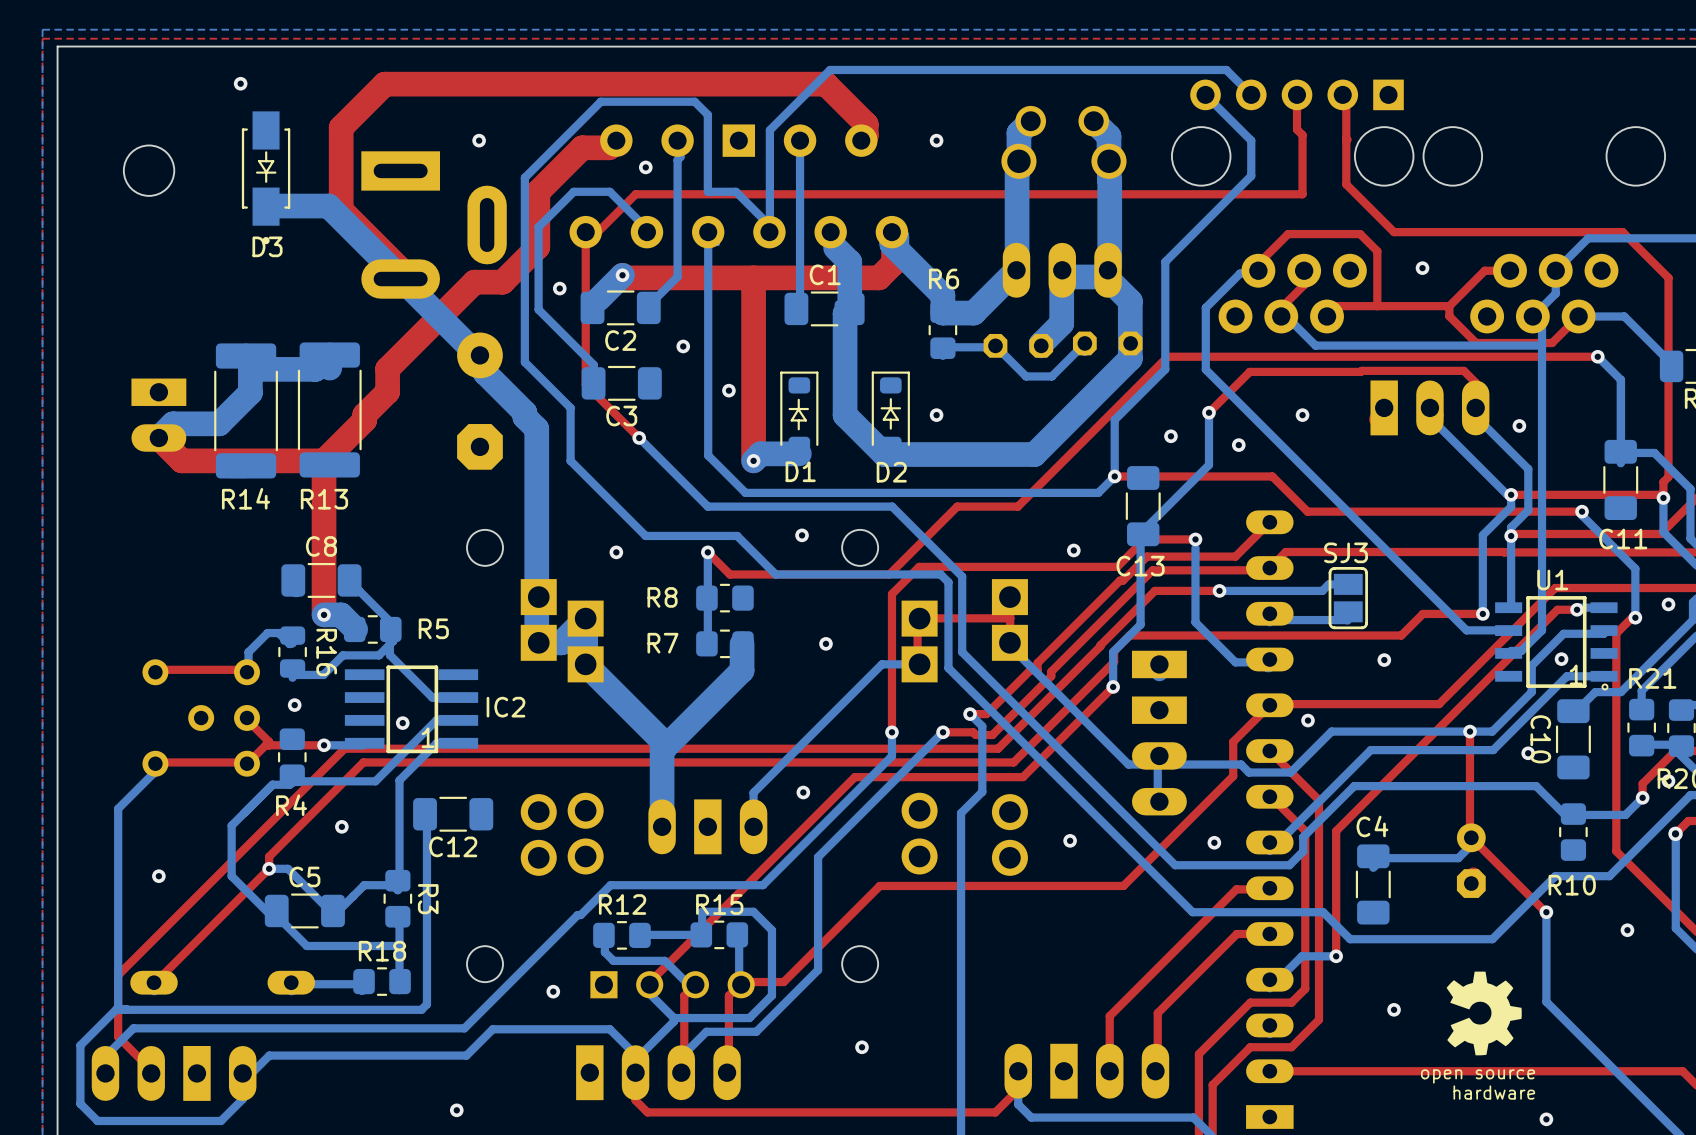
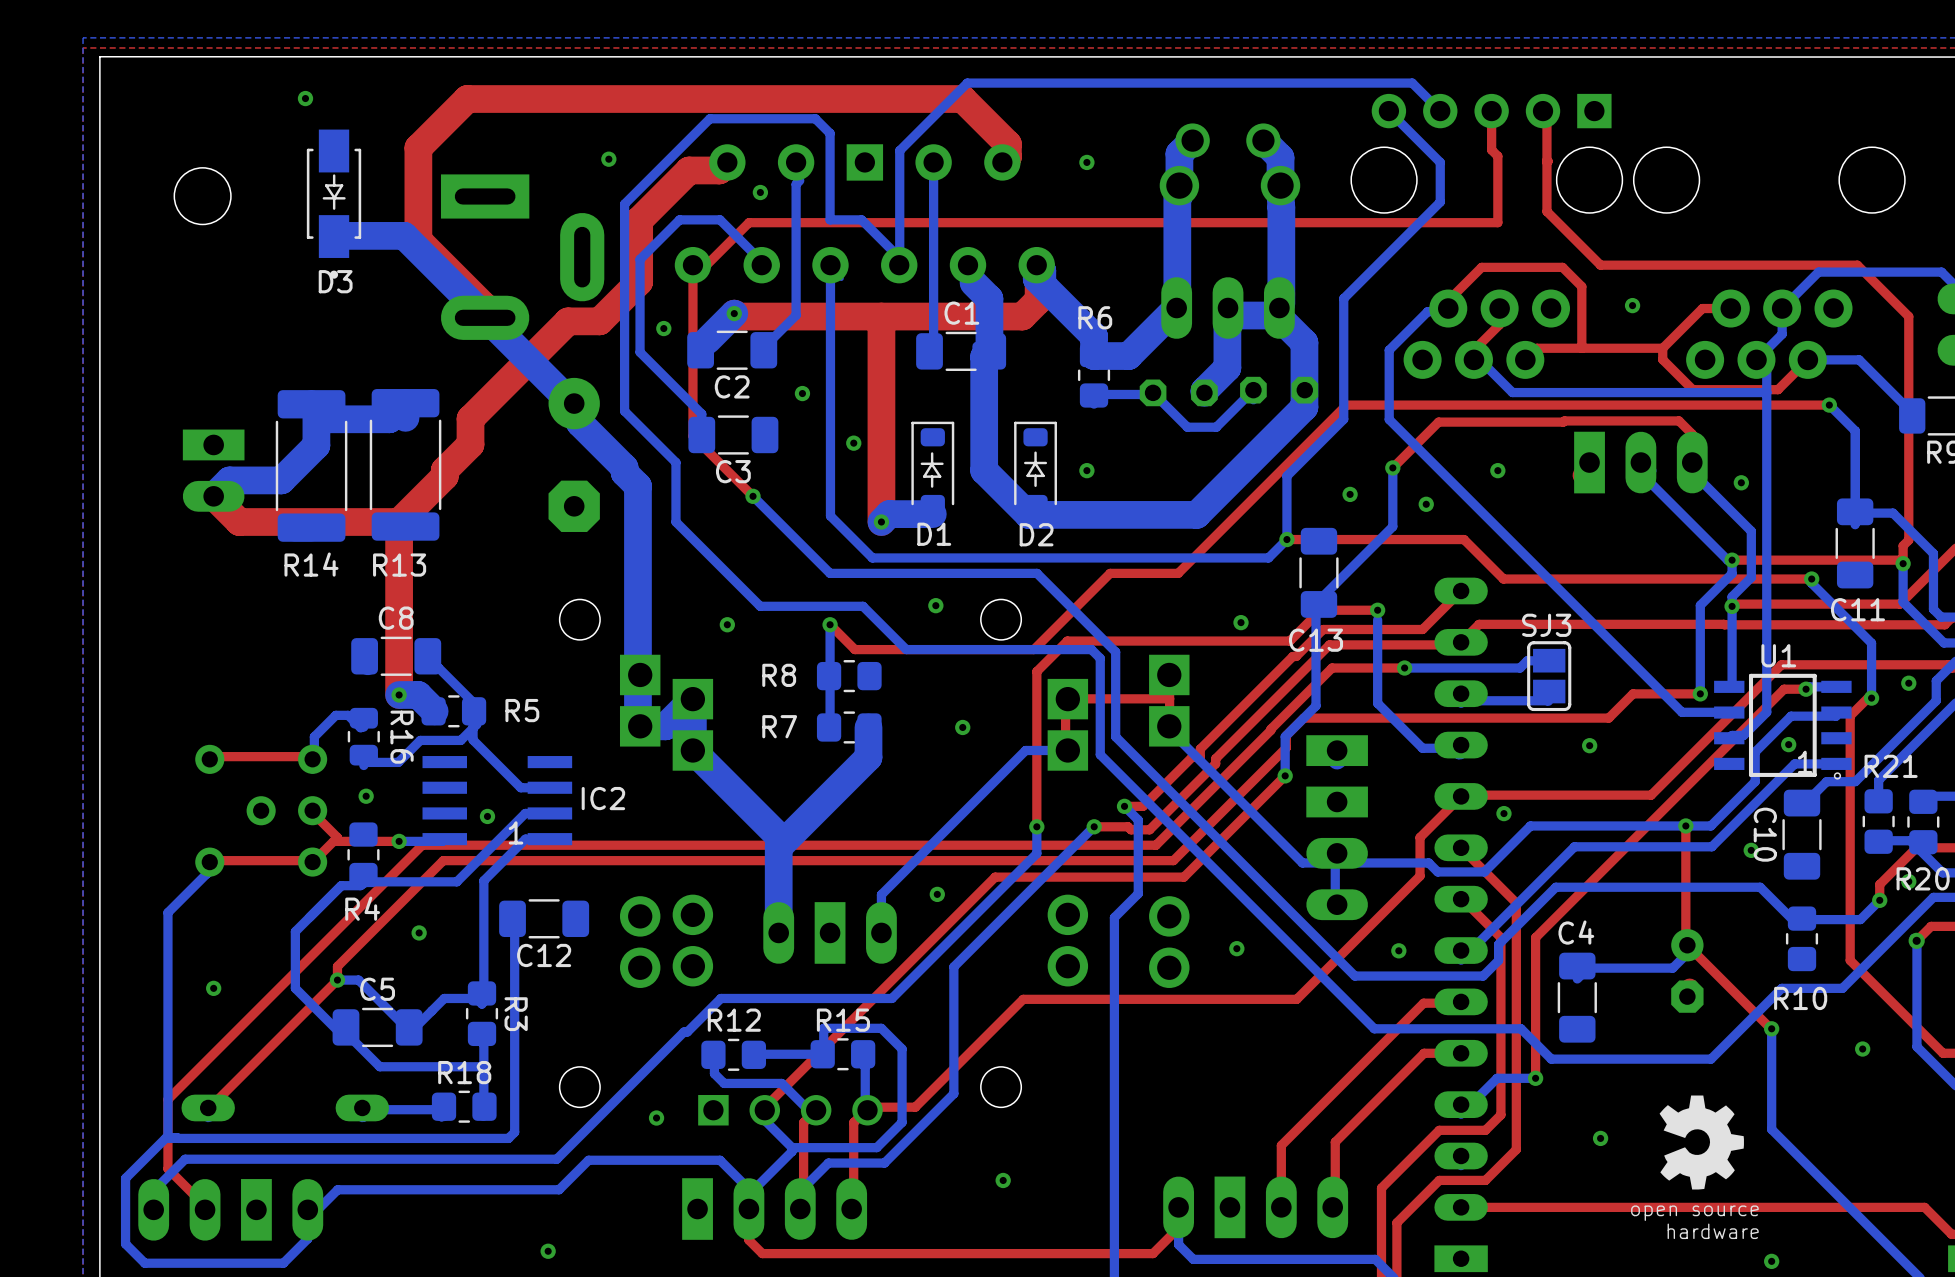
via position: (479, 140) -> (608, 159)
line: (436, 667) (388, 667) (388, 751) (436, 751) (436, 667) -> none

